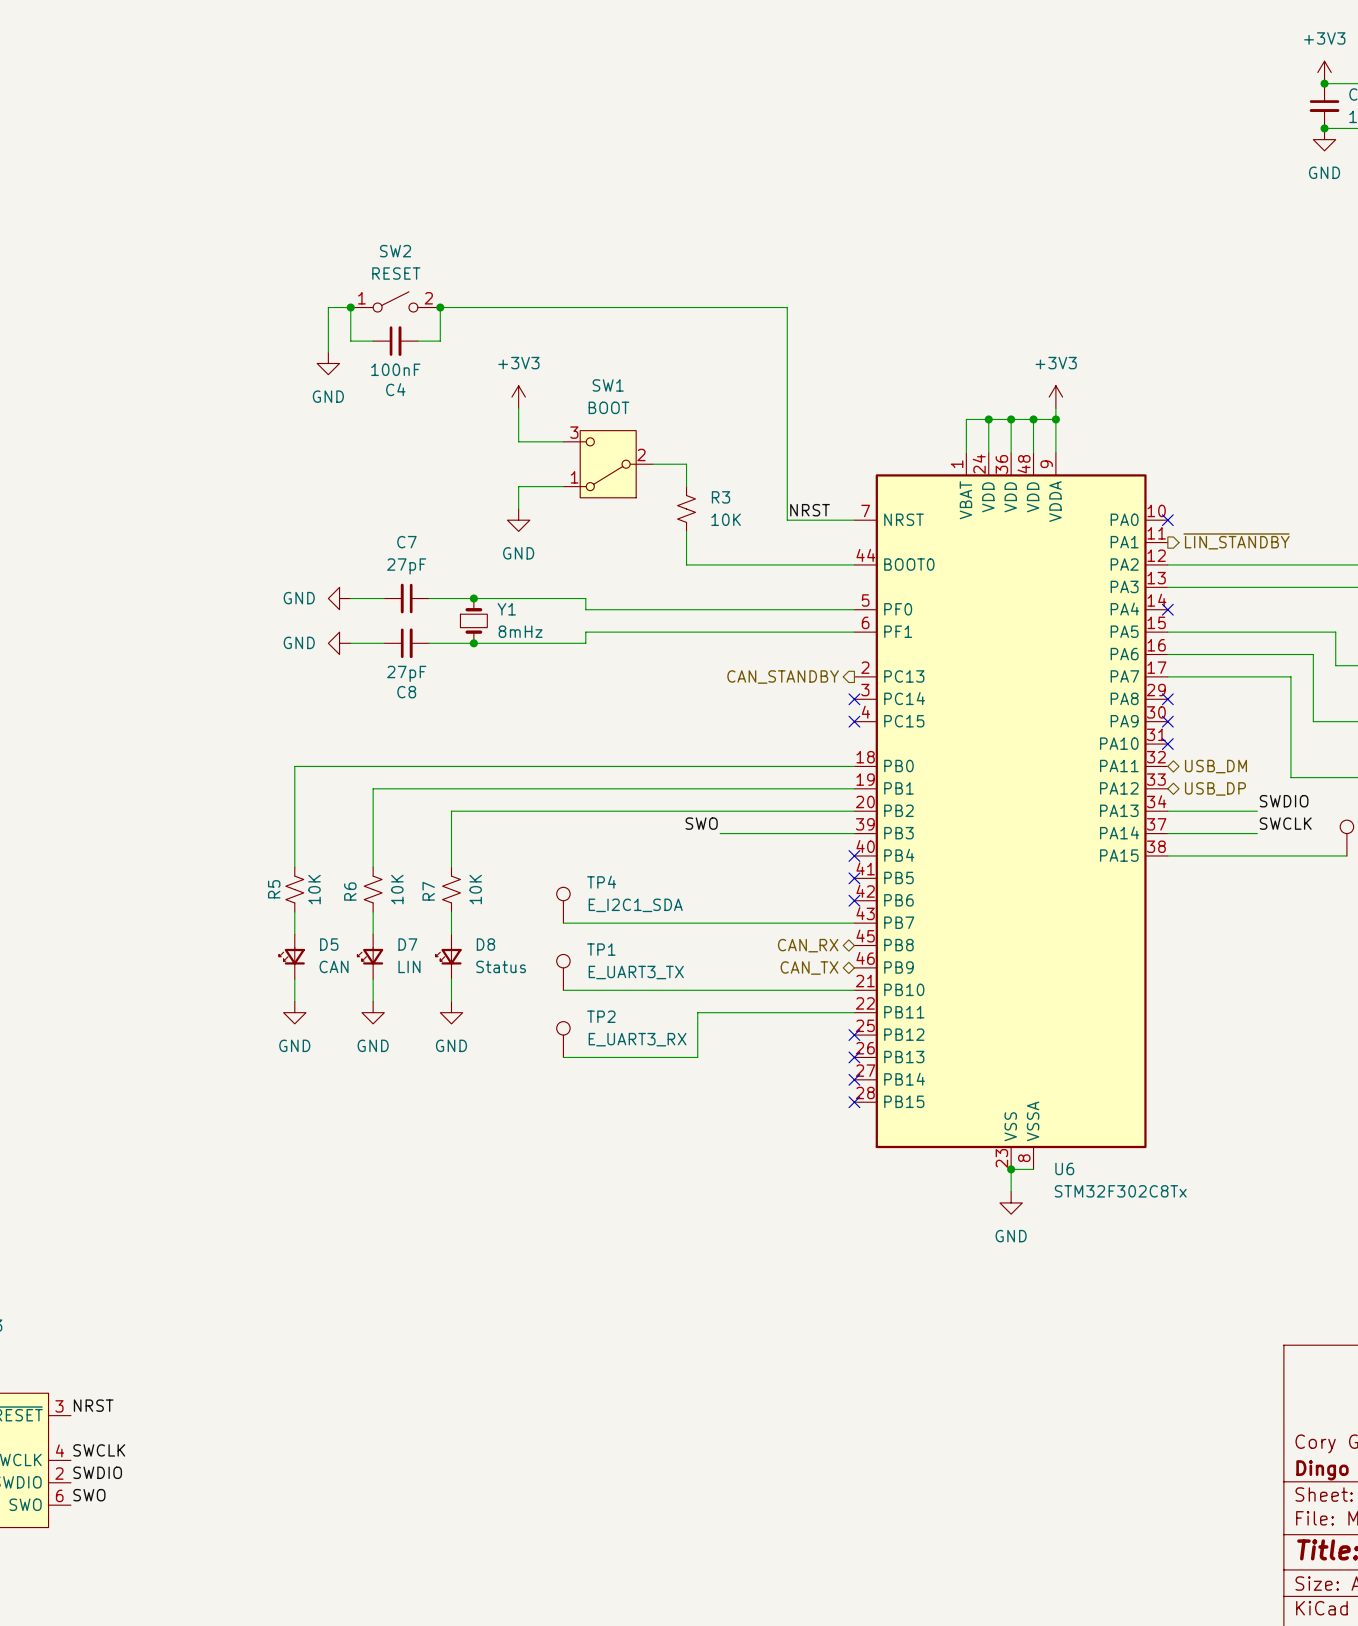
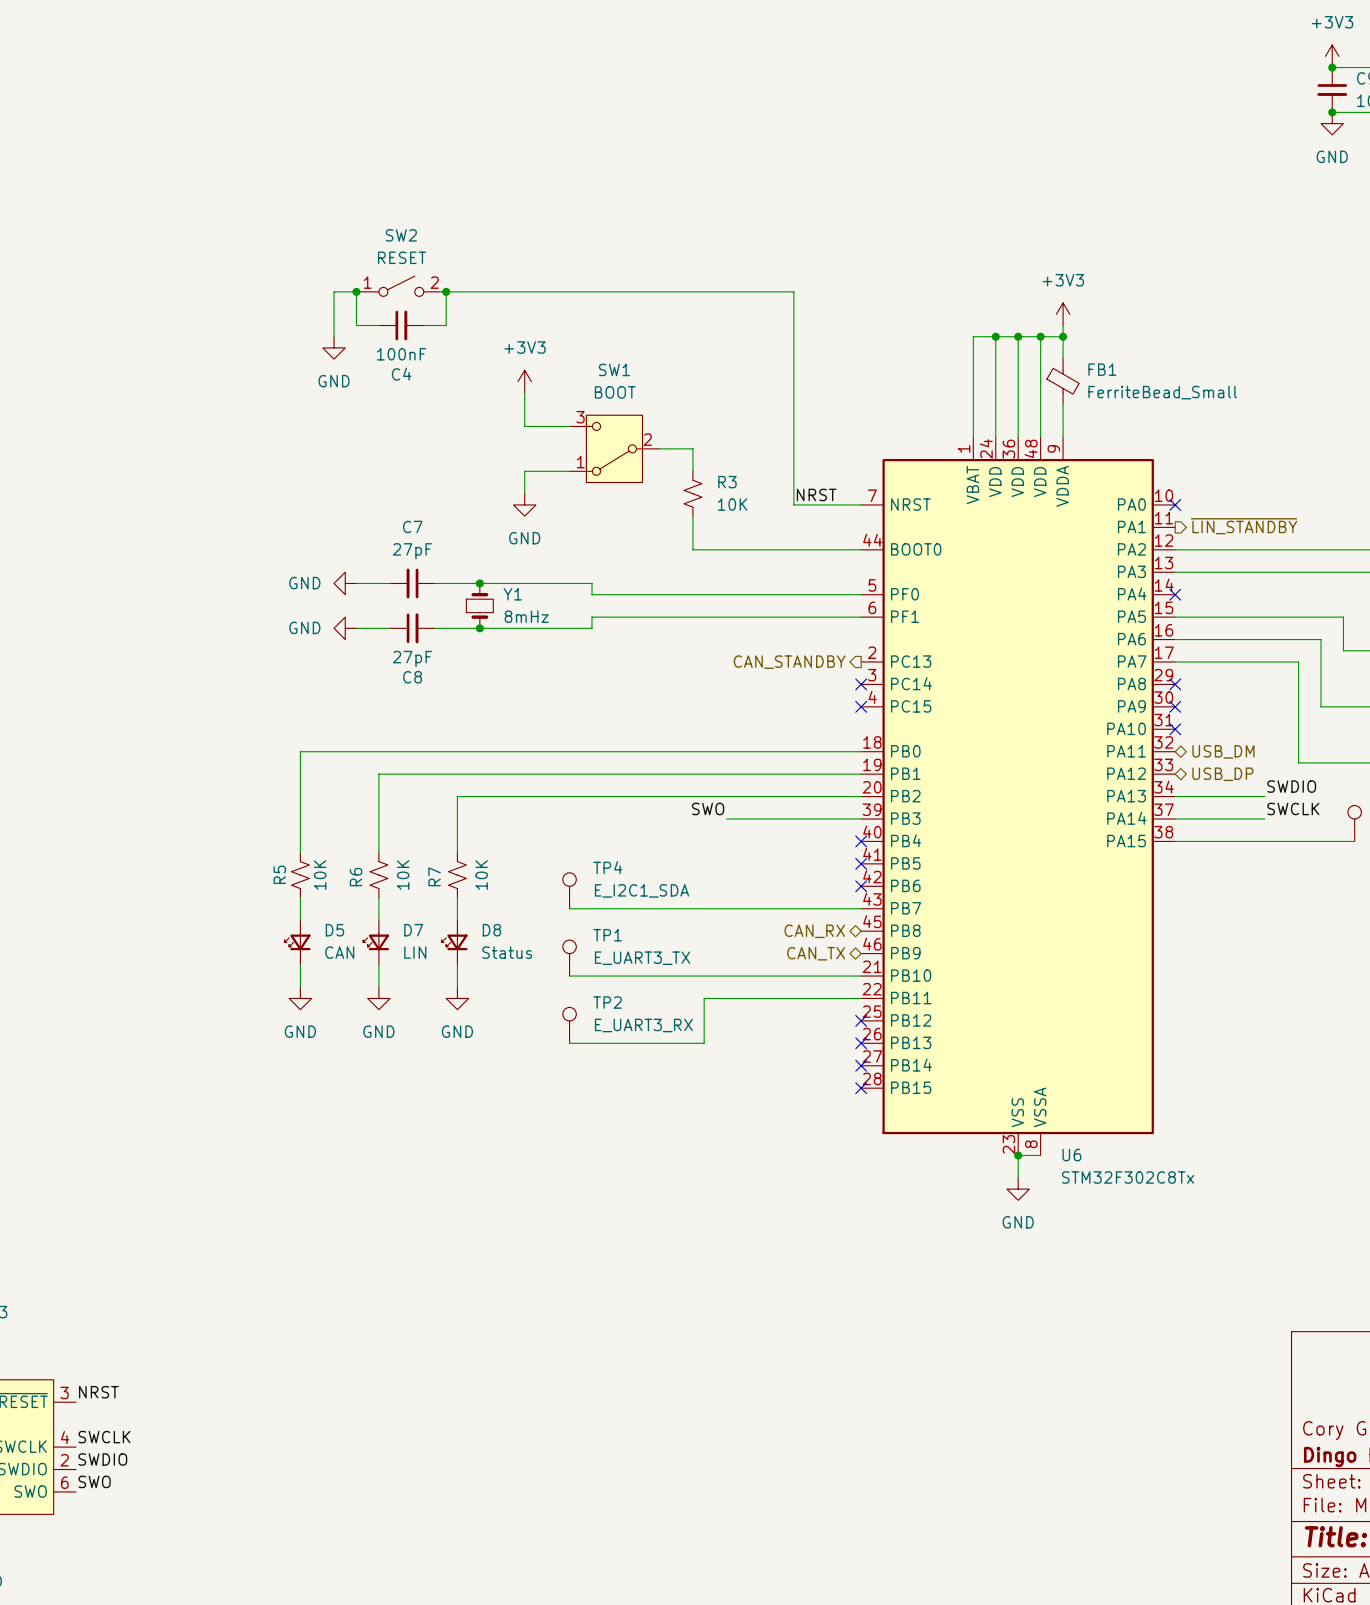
wire: none -> (1063, 325) (1063, 359)
wire: none -> (995, 336) (995, 404)
junction: none -> (995, 336)
wire: none -> (1018, 336) (1018, 404)
junction: none -> (1018, 336)
wire: none -> (1040, 336) (1040, 404)
junction: none -> (1040, 336)
junction: none -> (1063, 336)
power symbol position: +3V3 (1055, 397) -> +3V3 (1063, 314)
FB1: none -> FerriteBead_Small (1063, 381)
wire: (1055, 408) (1055, 419) (966, 419) -> (1063, 336) (973, 336) (973, 404)
junction: (988, 419) -> none
junction: (1011, 419) -> none
junction: (1033, 419) -> none
junction: (1055, 419) -> none

